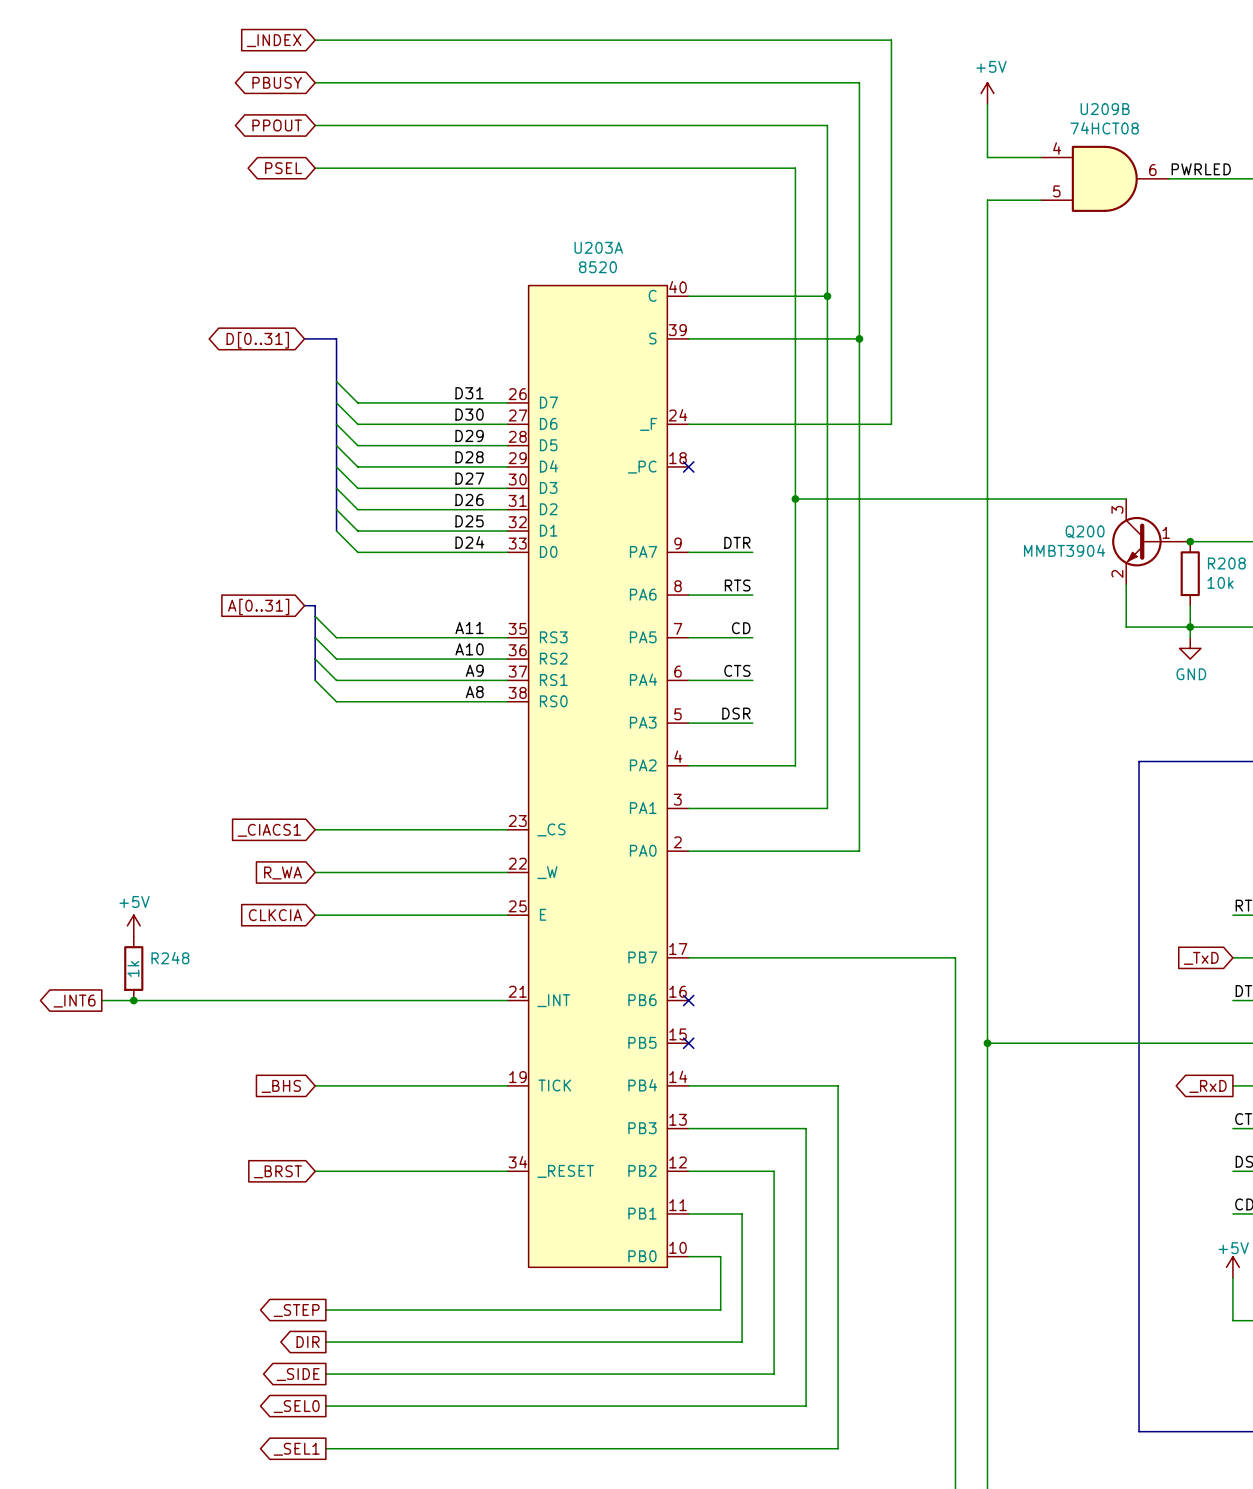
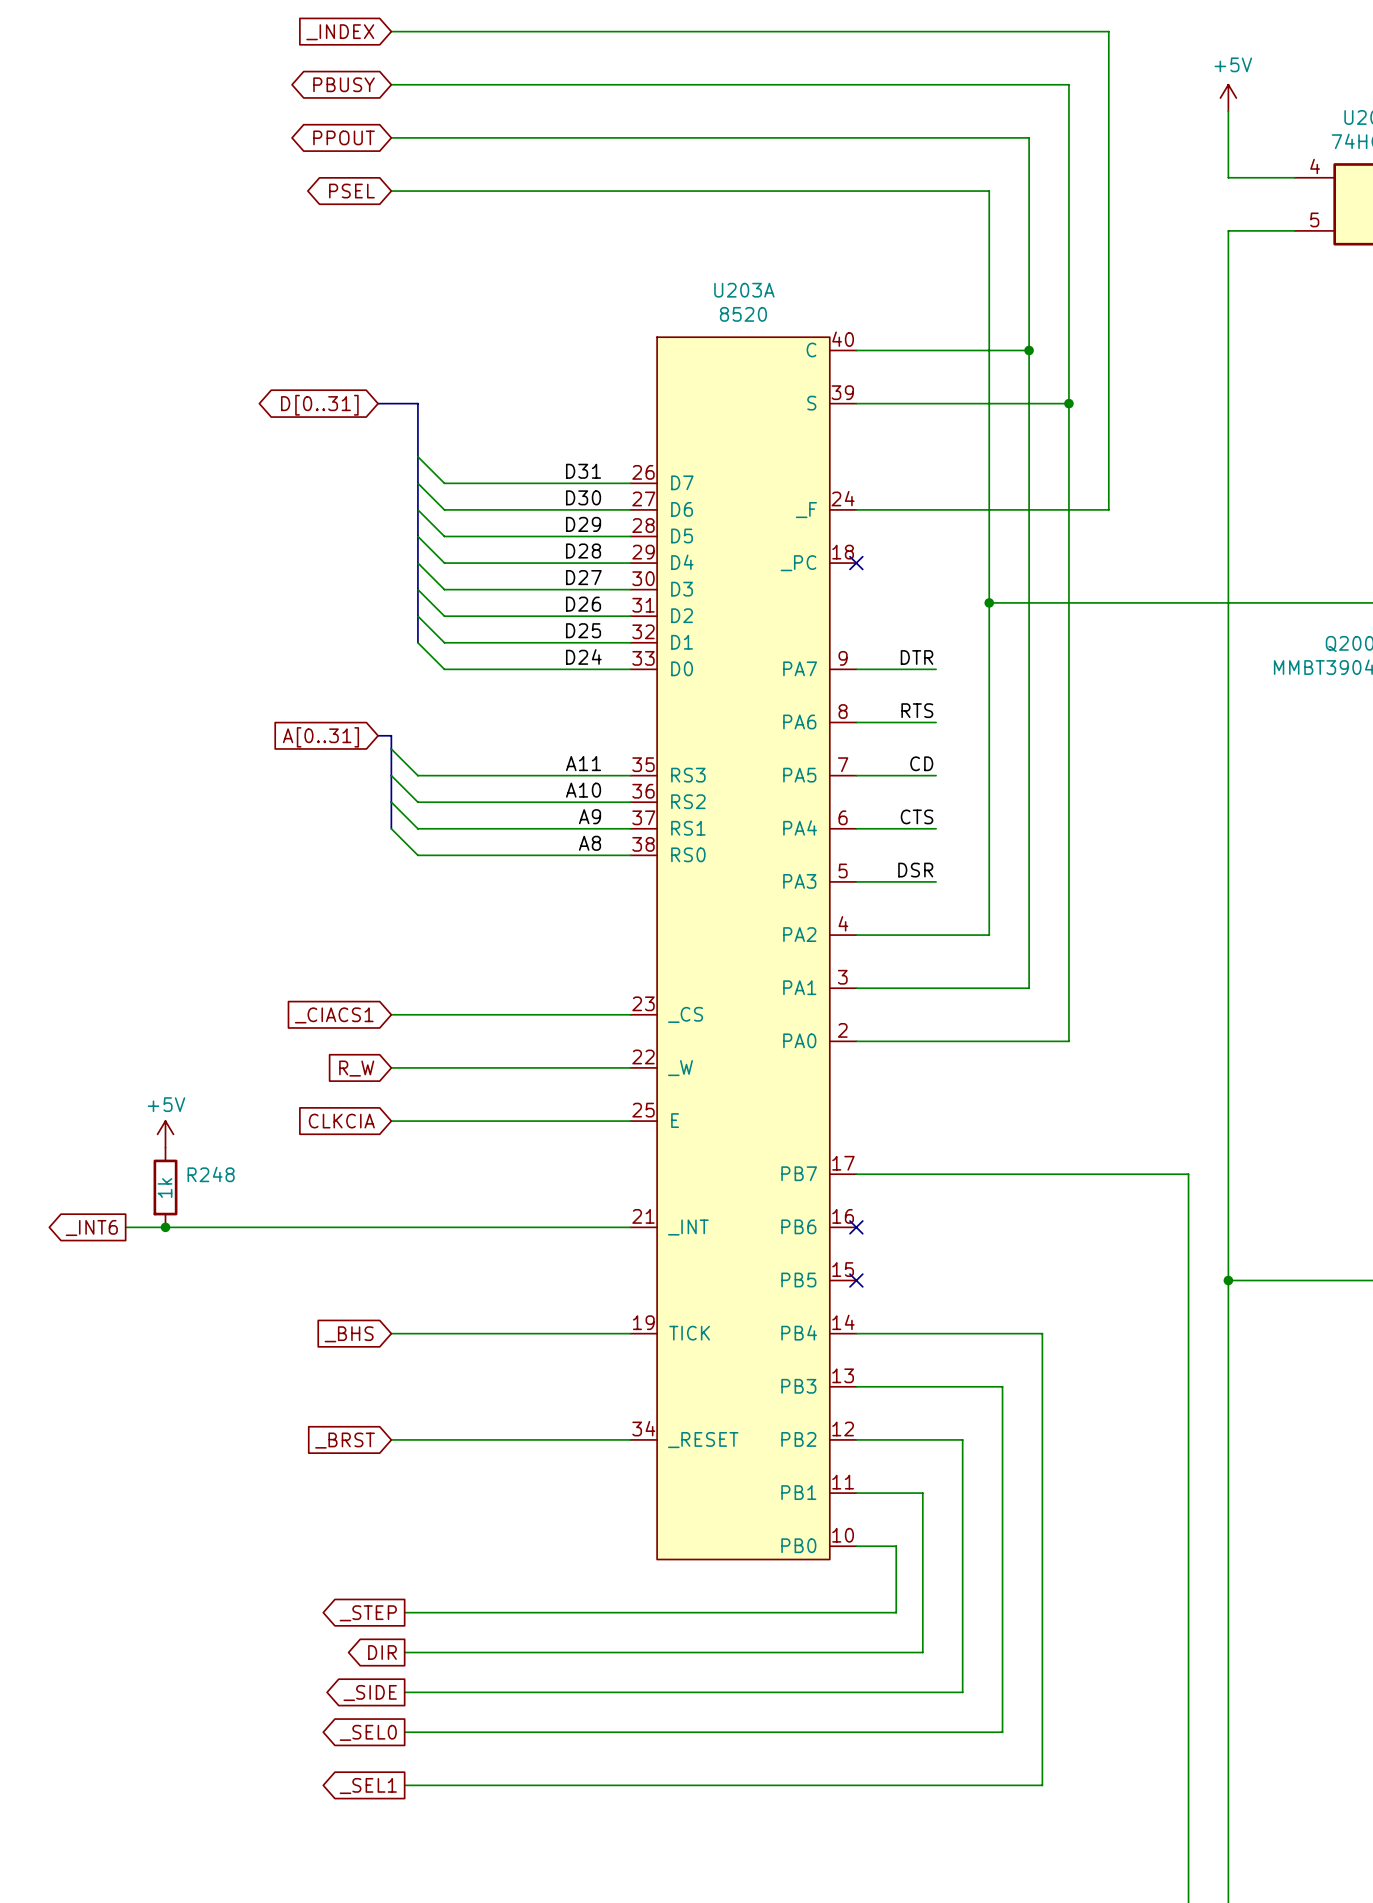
global label: R_WA (283, 873) -> R_W (356, 1068)

